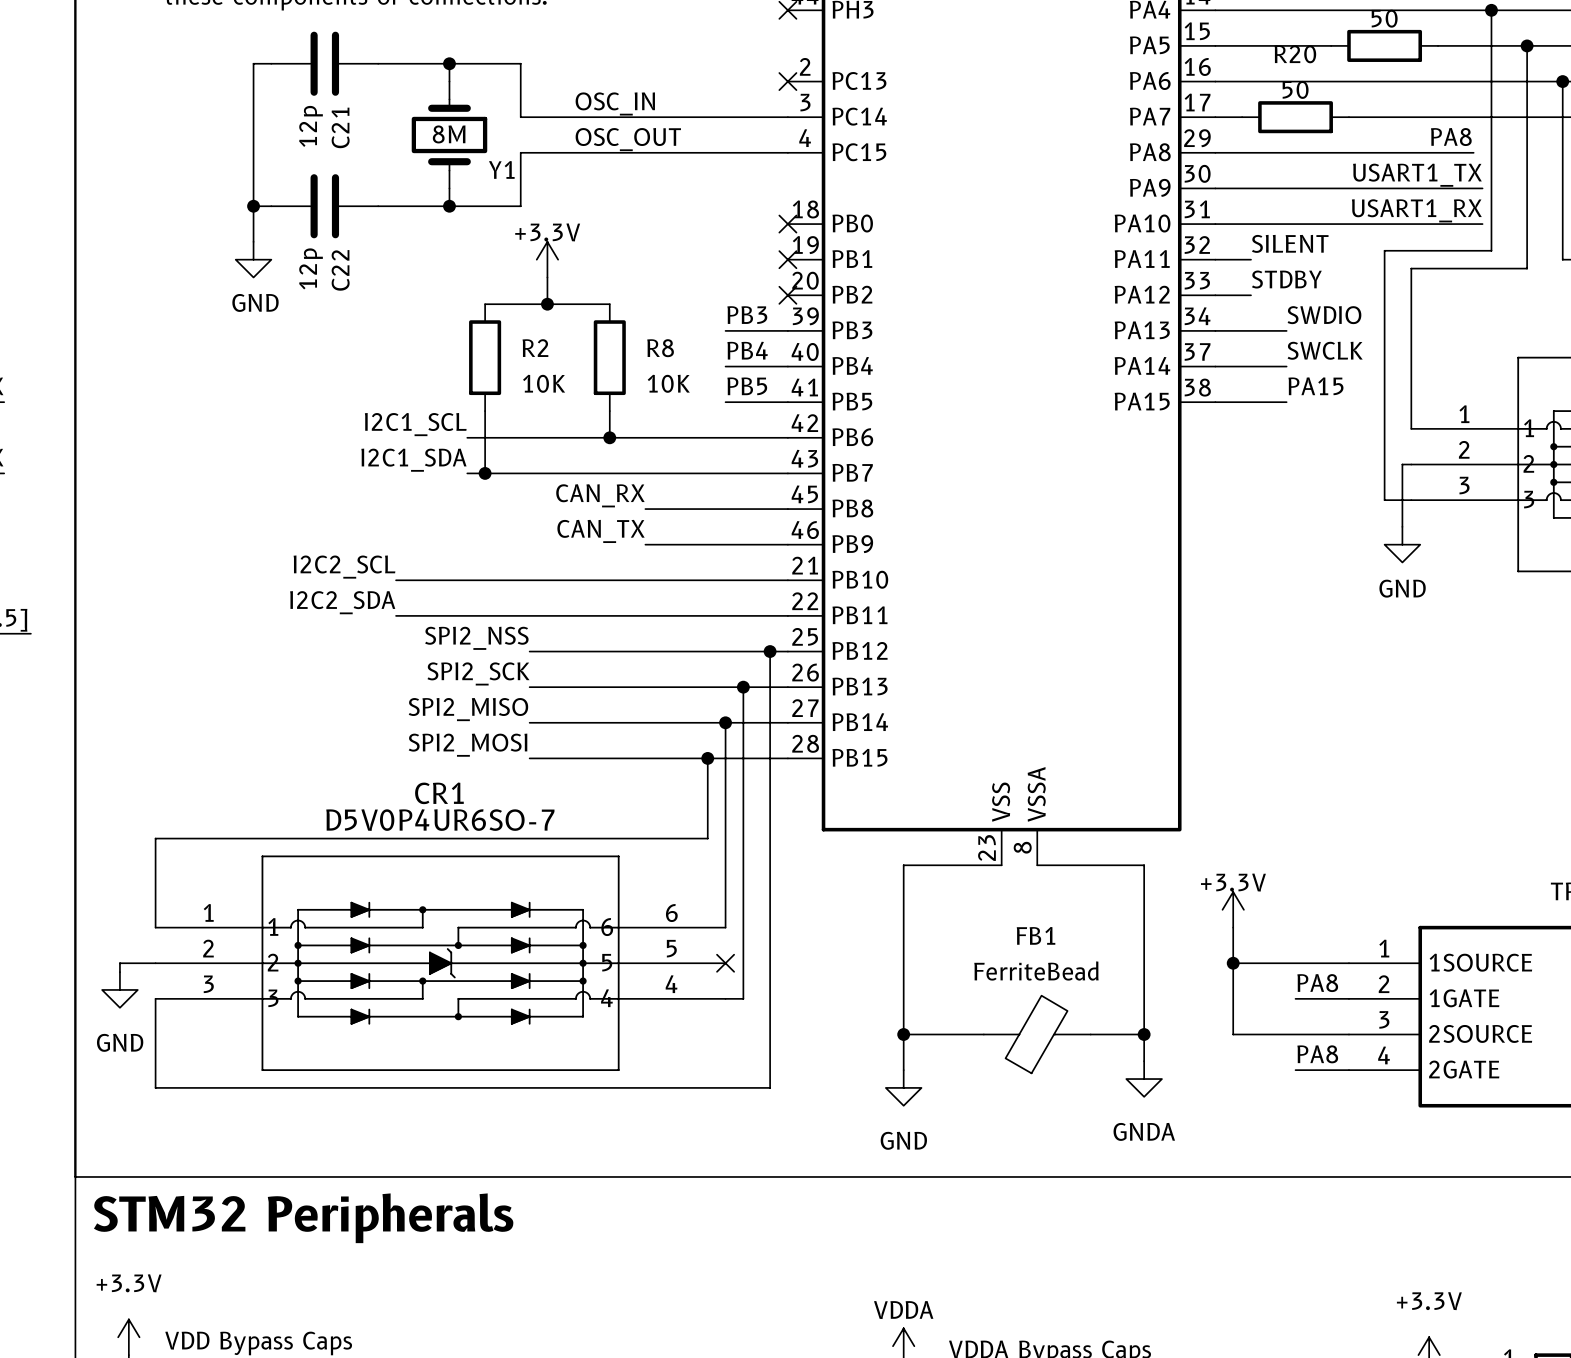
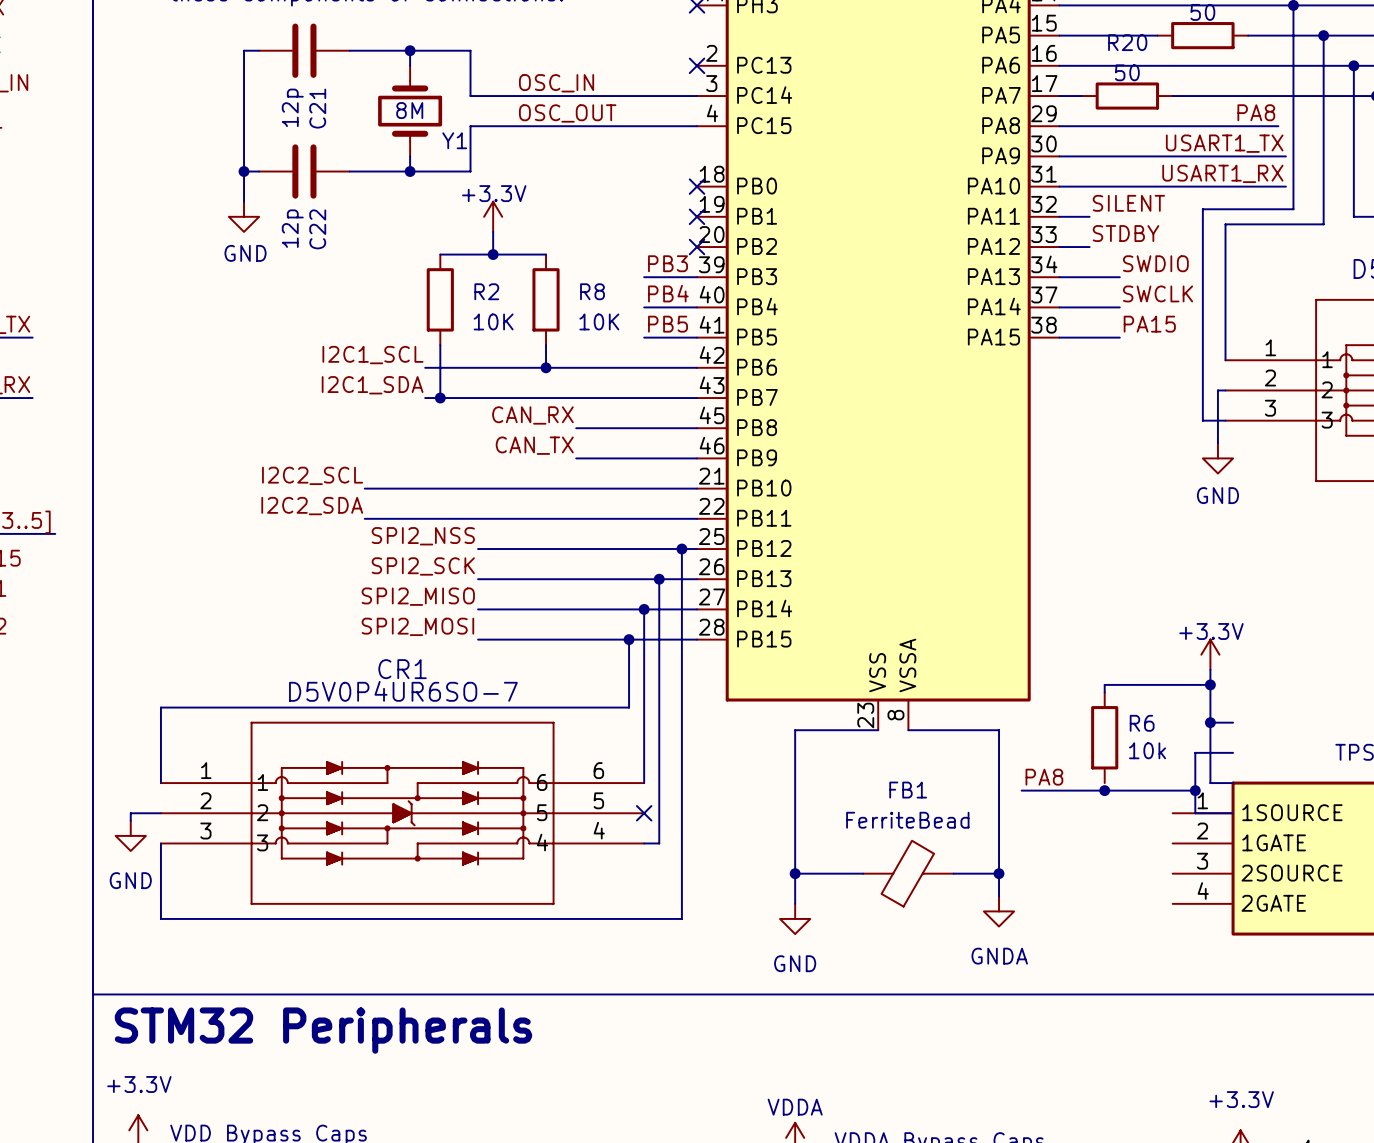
wire: none -> (1210, 669) (1210, 783) (1233, 783)
wire: none -> (1210, 684) (1104, 684) (1104, 692)
junction: none -> (1210, 684)
wire: none -> (1210, 722) (1233, 722)
junction: none -> (1210, 722)
R6: none -> 10k (1104, 737)
wire: none -> (1233, 752) (1195, 752) (1195, 813) (1233, 813)
power symbol position: +3.3V (1233, 909) -> +3.3V (1210, 654)
label: none -> PA8 (1044, 777)
wire: (1233, 927) (1233, 1034) (1348, 1034) -> none
wire: none -> (1021, 790) (1195, 790)
junction: none -> (1195, 790)
wire: (1233, 963) (1348, 963) -> none
junction position: (1233, 963) -> (1104, 790)
label: PA8 (1317, 983) -> none
wire: (1295, 998) (1348, 998) -> none
label: PA8 (1317, 1054) -> none
wire: (1295, 1070) (1348, 1070) -> none

